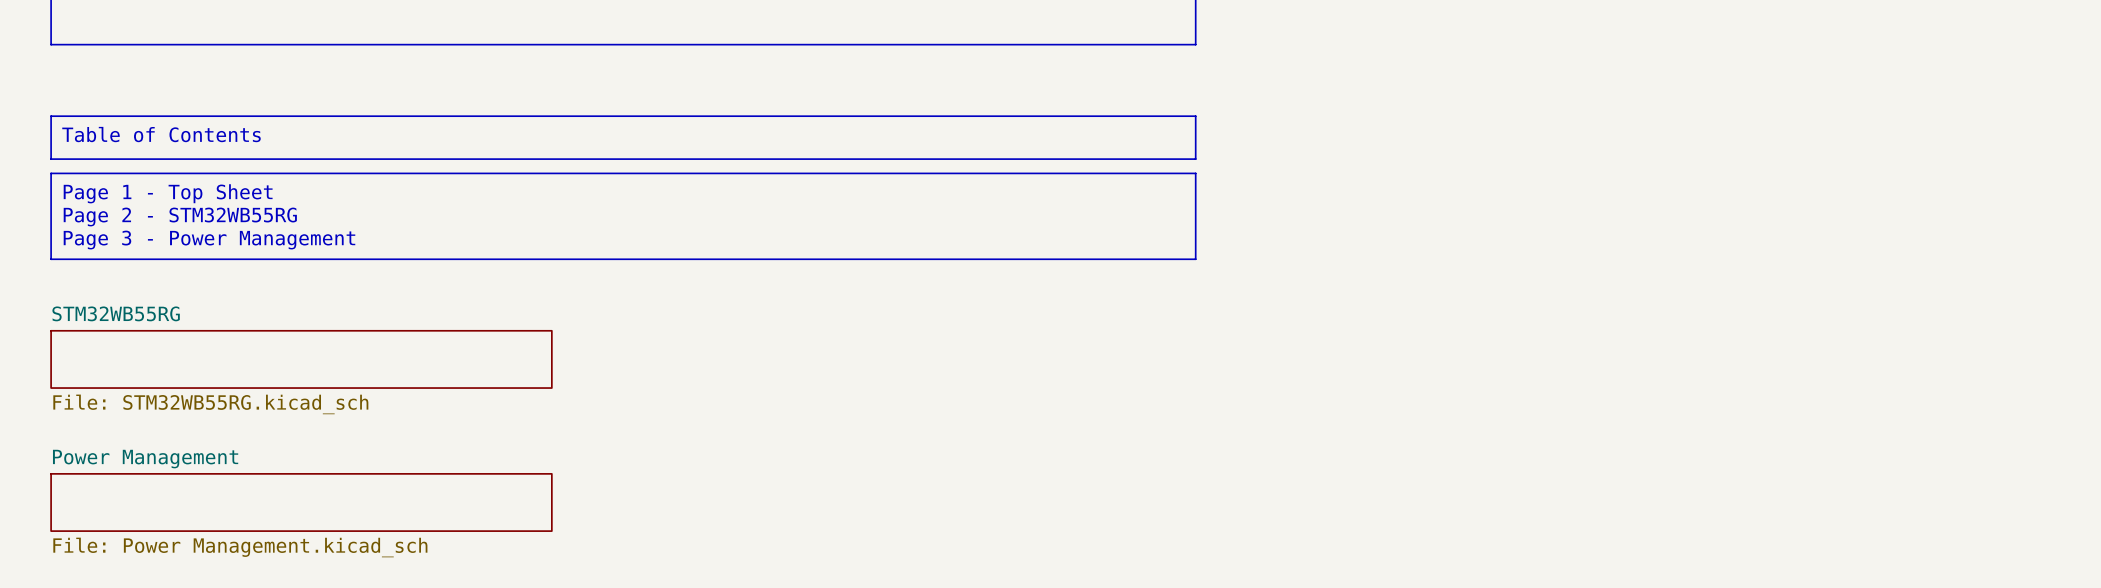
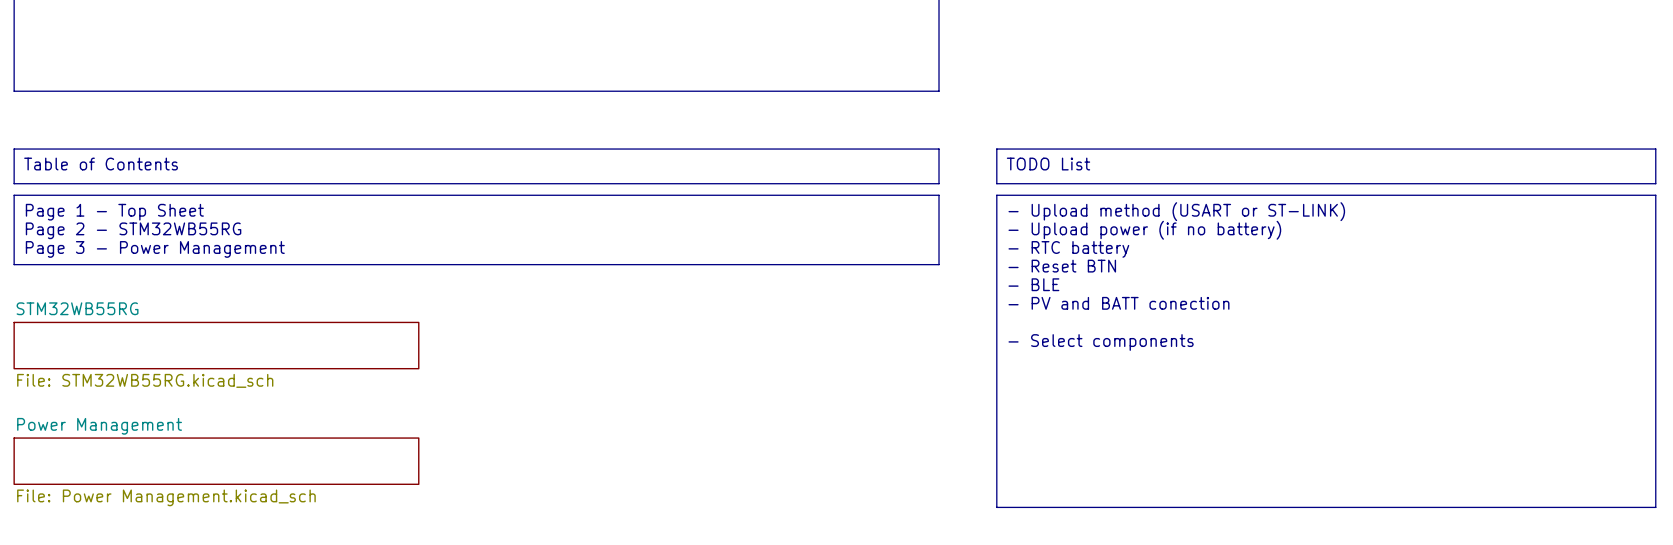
line: none -> (996, 149) (1655, 149) (1655, 183) (996, 183) (996, 149)
text: none -> TODO List (1048, 164)
line: none -> (996, 195) (996, 507) (1655, 507) (1655, 195) (996, 195)
text: none -> - Upload method (USART or ST-LINK) (1176, 211)
text: none -> - Upload power (if no battery) (1144, 230)
text: none -> - RTC battery (1068, 249)
text: none -> - Reset BTN (1062, 266)
text: none -> - BLE (1033, 284)
text: none -> - PV and BATT conection (1118, 303)
text: none -> - Select components (1101, 342)

